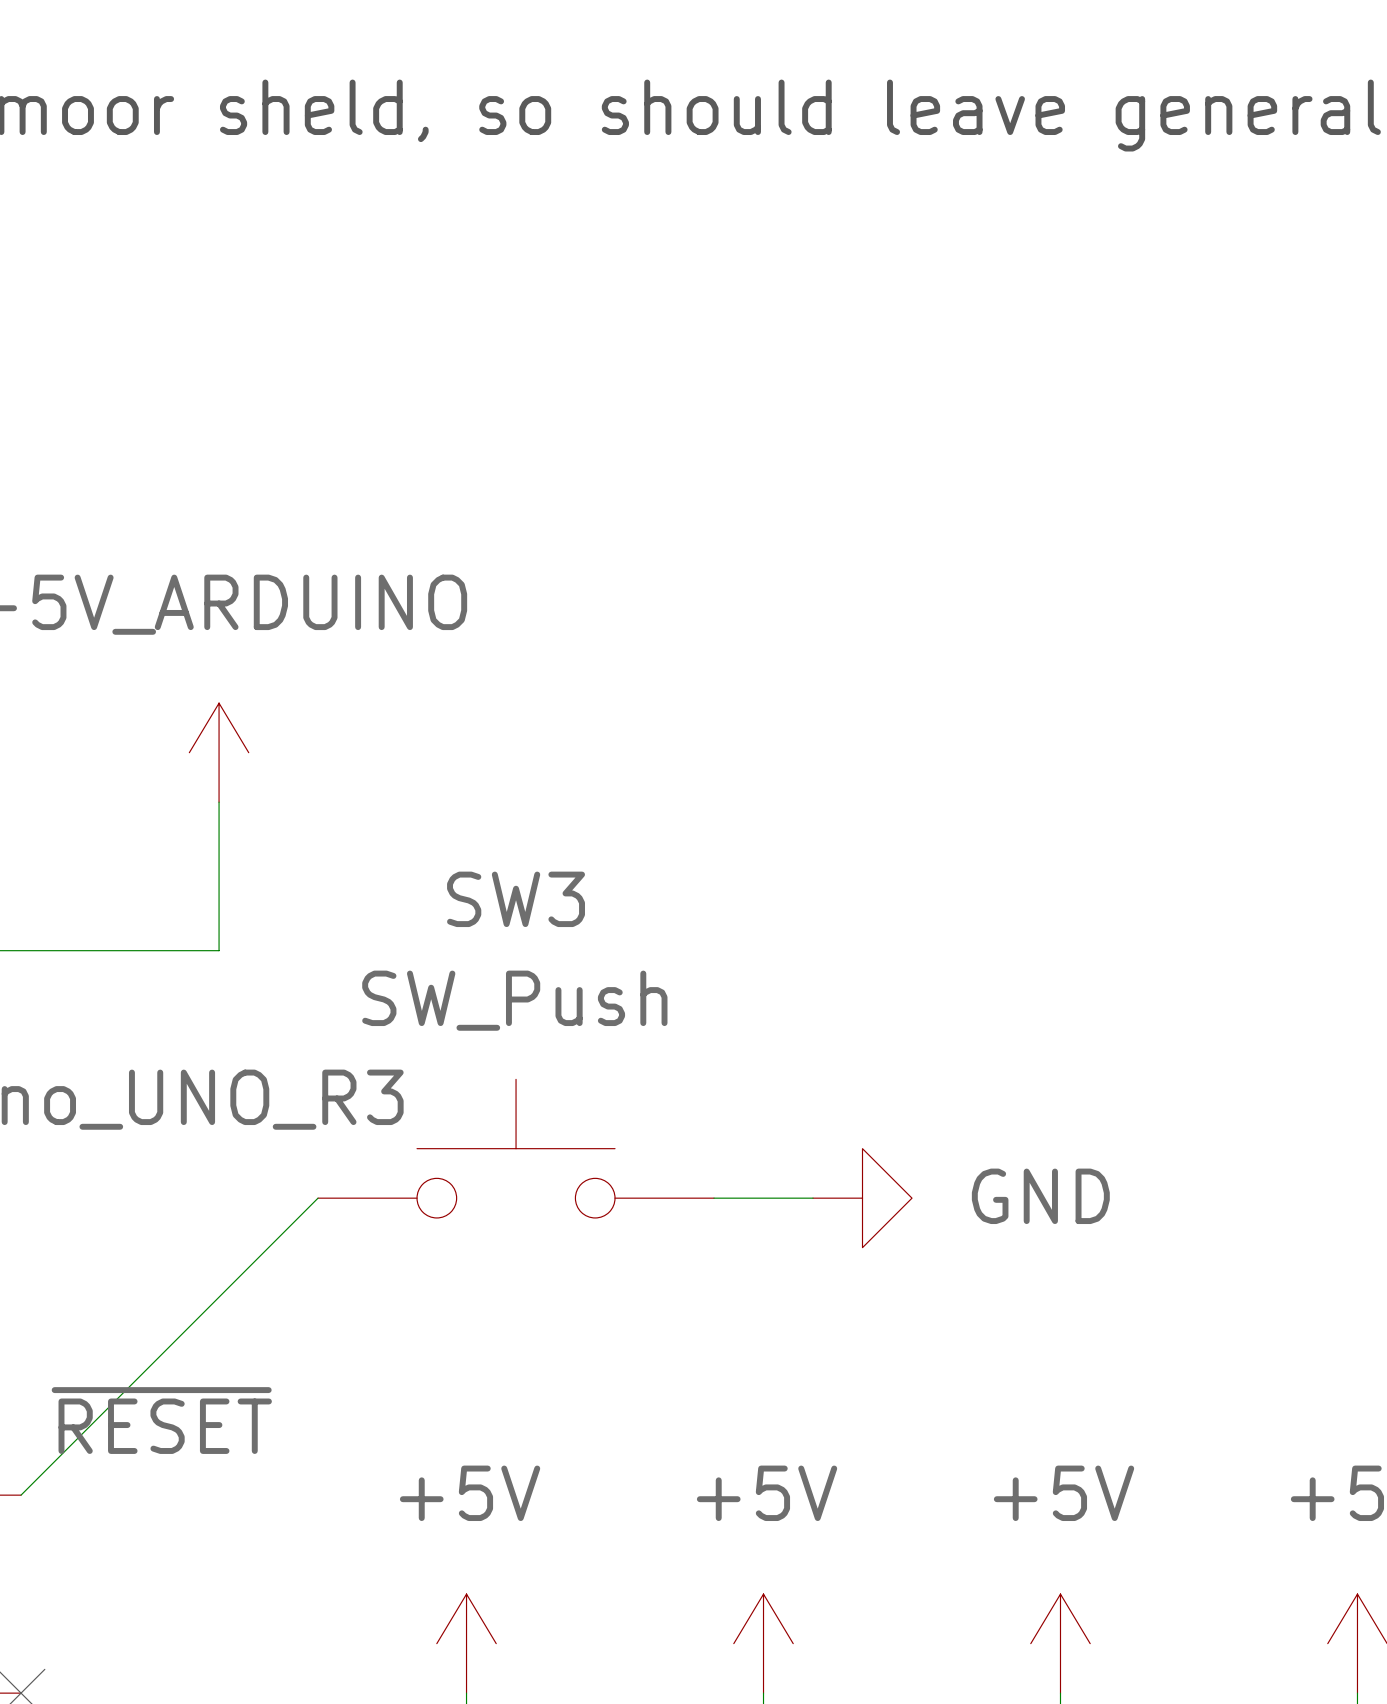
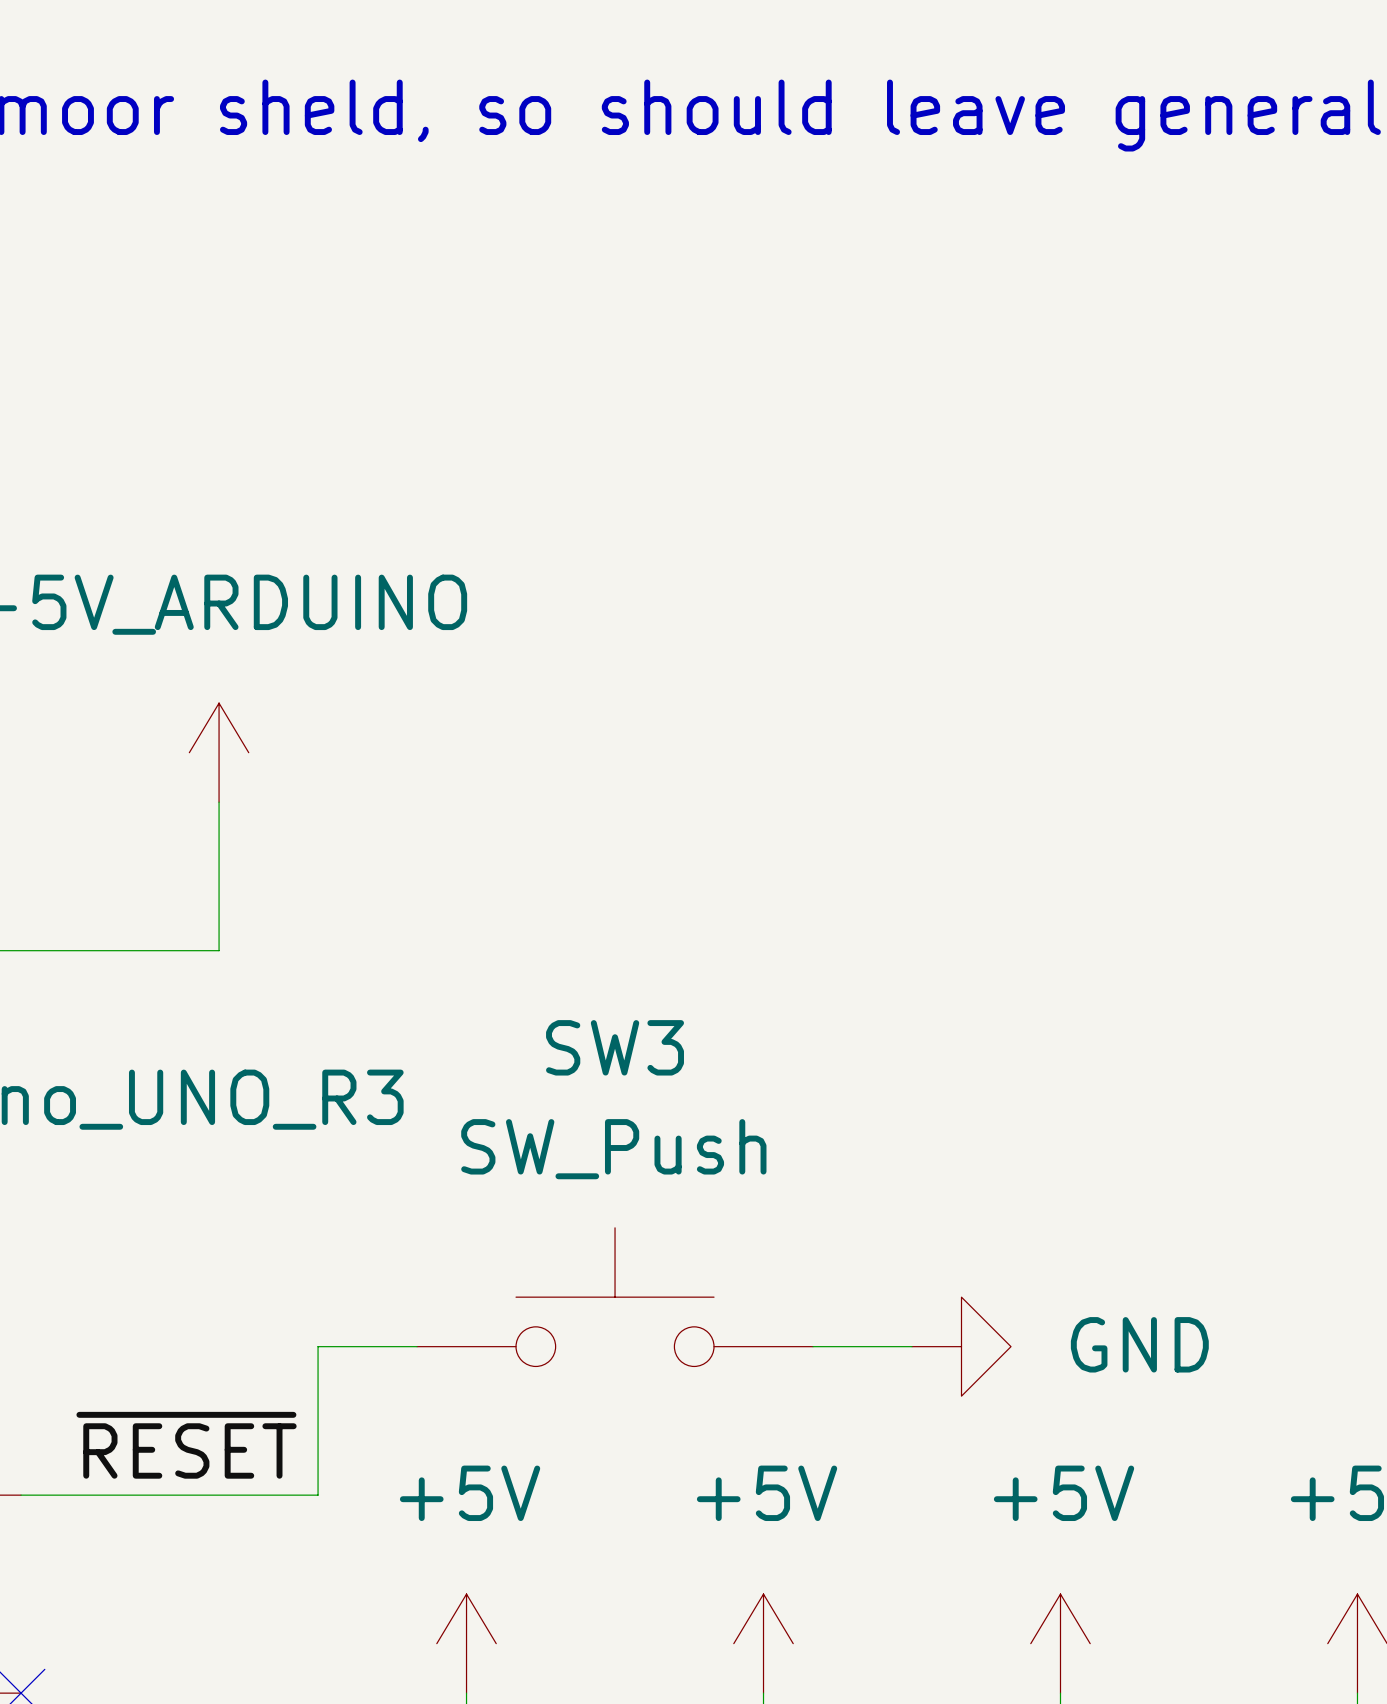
SW3 position: (516, 1148) -> (615, 1297)
wire: (318, 1198) (21, 1495) -> (417, 1346) (318, 1346) (318, 1495) (21, 1495)
wire: (714, 1198) (813, 1198) -> (813, 1346) (912, 1346)
power symbol position: GND (862, 1198) -> GND (961, 1346)
label position: ~{RESET} (161, 1420) -> ~{RESET} (186, 1445)

